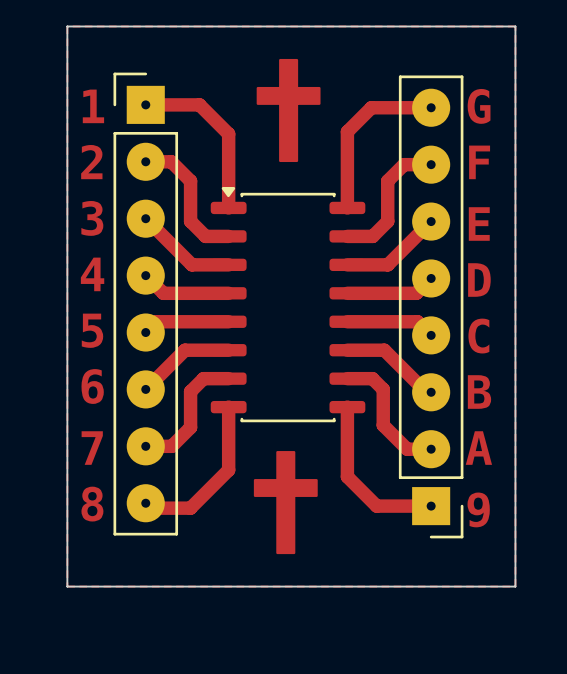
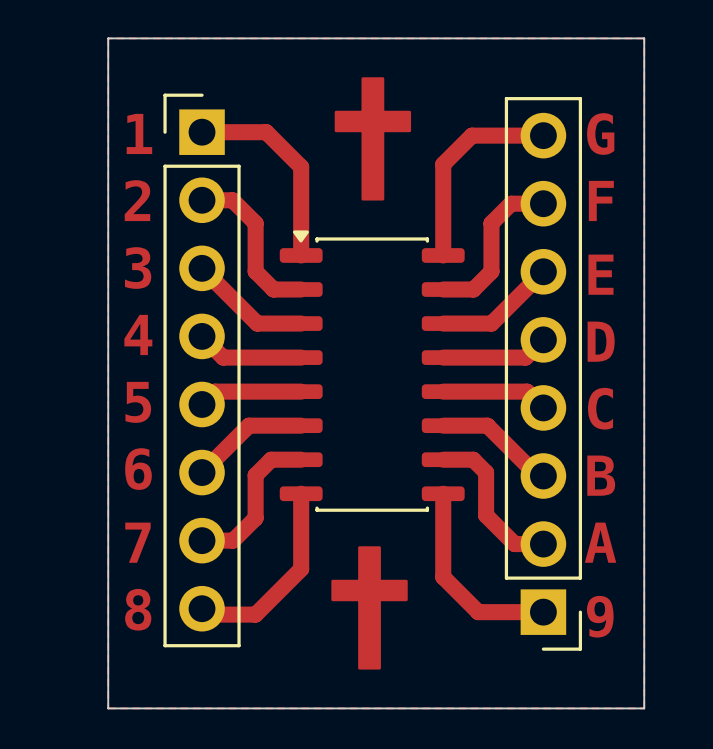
part footprint: [113, 72, 179, 536] -> [163, 93, 241, 648]
part footprint: [398, 75, 464, 539] -> [504, 97, 583, 651]

